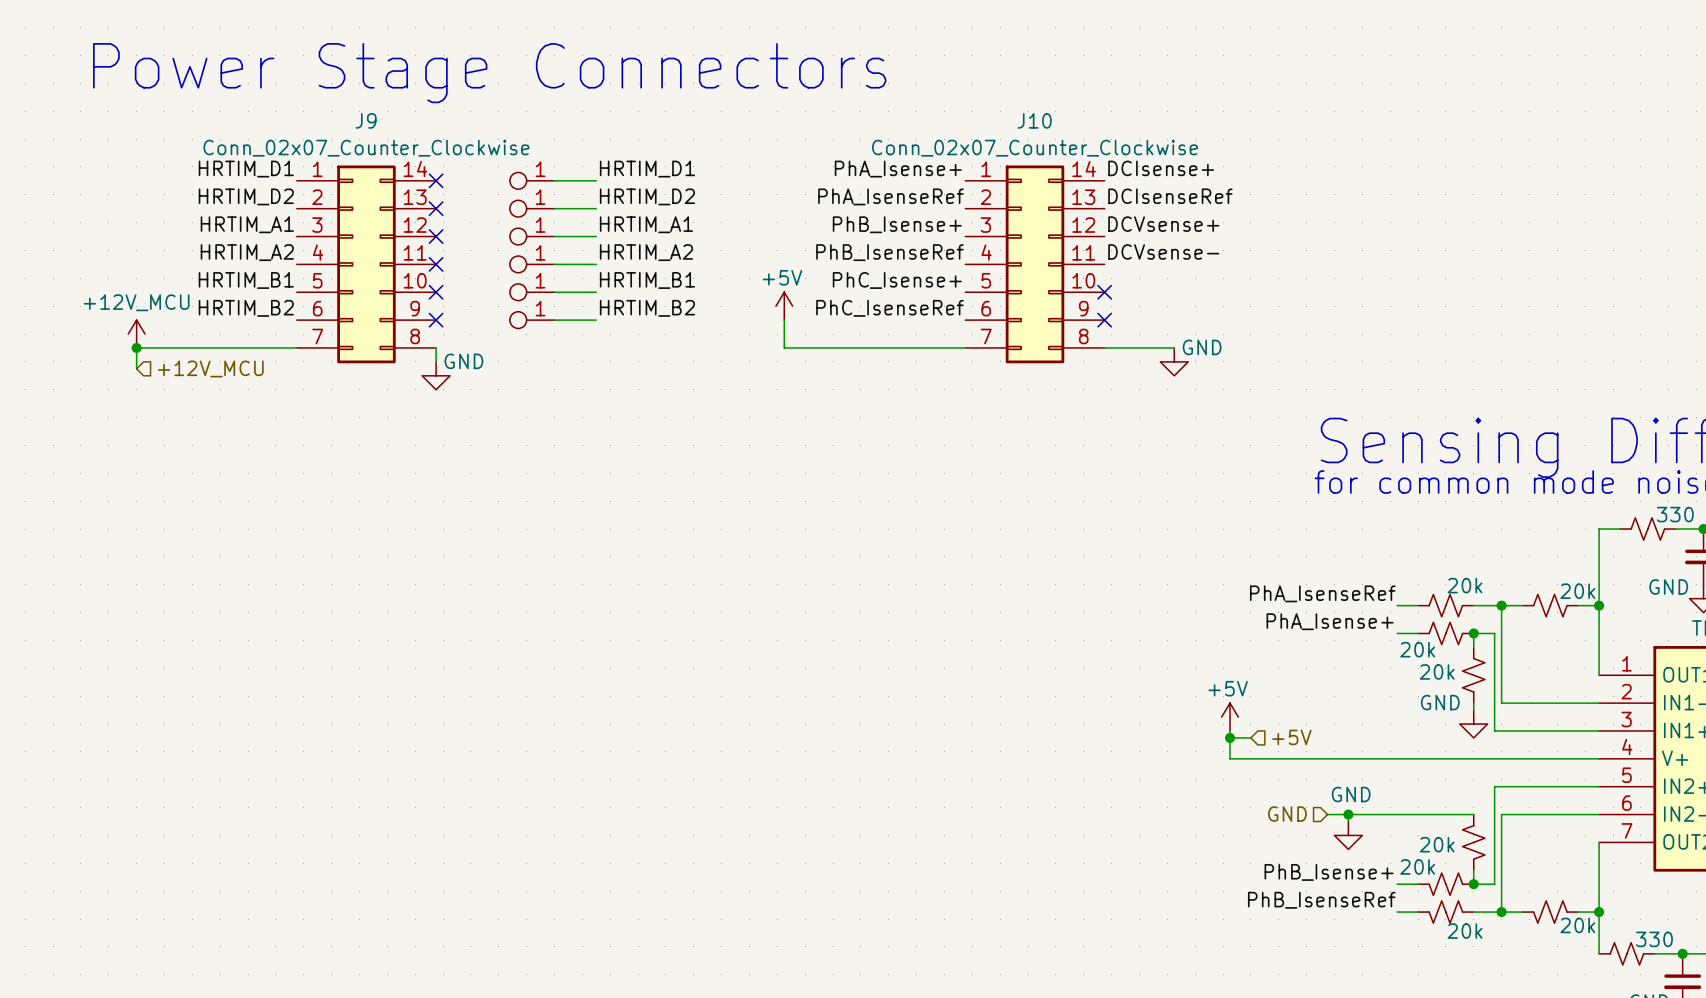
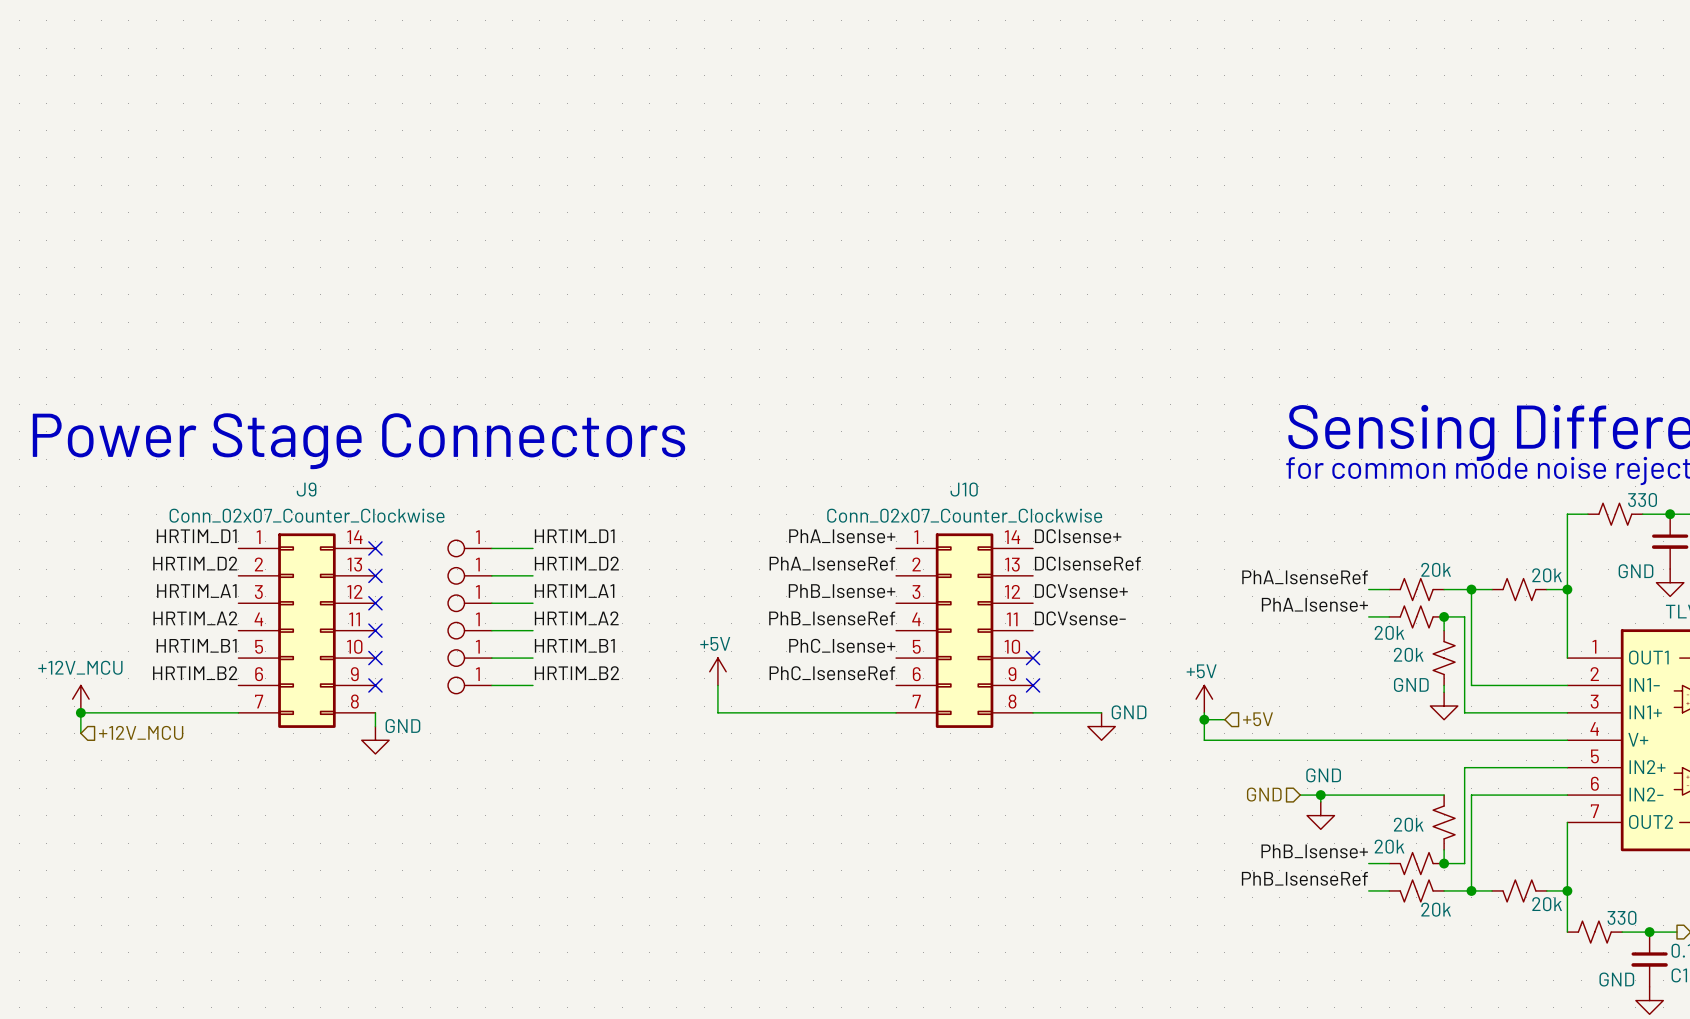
text: Power Stage Connectors (489, 73) -> none
label: DCIsense+ (1161, 168) -> none
label: HRTIM_D1 (246, 169) -> none
label: HRTIM_D1 (647, 169) -> none
label: PhA_Isense+ (898, 169) -> none
no-connect mark: (436, 180) -> none
part: (532, 180) -> none
wire: (554, 180) (596, 180) -> none
label: HRTIM_D2 (246, 196) -> none
label: HRTIM_D2 (647, 196) -> none
label: PhA_IsenseRef (890, 196) -> none
label: DCIsenseRef (1170, 196) -> none
no-connect mark: (436, 208) -> none
part: (532, 208) -> none
wire: (554, 208) (596, 208) -> none
label: HRTIM_A1 (247, 224) -> none
label: HRTIM_A1 (646, 224) -> none
label: PhB_Isense+ (897, 224) -> none
label: DCVsense+ (1163, 224) -> none
no-connect mark: (436, 236) -> none
part: (532, 236) -> none
wire: (554, 236) (596, 236) -> none
label: DCVsense- (1163, 251) -> none
label: HRTIM_A2 (247, 252) -> none
label: HRTIM_A2 (646, 252) -> none
label: PhB_IsenseRef (889, 252) -> none
J9 position: (366, 264) -> (306, 630)
no-connect mark: (436, 264) -> none
part: (532, 264) -> none
wire: (554, 264) (596, 264) -> none
J10 position: (1034, 264) -> (964, 630)
label: HRTIM_B1 (246, 280) -> none
label: HRTIM_B1 (647, 280) -> none
label: PhC_Isense+ (897, 280) -> none
no-connect mark: (436, 292) -> none
part: (532, 292) -> none
wire: (554, 292) (596, 292) -> none
no-connect mark: (1104, 292) -> none
power symbol: +5V (784, 306) -> none
label: HRTIM_B2 (246, 308) -> none
label: HRTIM_B2 (647, 308) -> none
label: PhC_IsenseRef (889, 308) -> none
no-connect mark: (436, 320) -> none
part: (532, 320) -> none
wire: (554, 320) (596, 320) -> (491, 548) (532, 548)
wire: (784, 320) (784, 347) (965, 347) -> none
no-connect mark: (1104, 320) -> none
power symbol: +12V_MCU (136, 334) -> none
junction: (136, 347) -> none
wire: (296, 347) (136, 347) (136, 368) -> none
wire: (436, 347) (436, 361) -> none
wire: (1104, 347) (1174, 347) -> none
power symbol: GND (1174, 361) -> none
hierarchical label: +12V_MCU (210, 368) -> none
power symbol: GND (436, 375) -> none
text: none -> Power Stage Connectors (359, 441)
label: none -> DCIsense+ (1078, 536)
label: none -> HRTIM_D1 (196, 536)
label: none -> HRTIM_D1 (574, 536)
label: none -> PhA_Isense+ (842, 536)
no-connect mark: none -> (375, 548)
part: none -> (469, 548)
label: none -> HRTIM_D2 (195, 563)
label: none -> HRTIM_D2 (576, 563)
label: none -> PhA_IsenseRef (832, 563)
label: none -> DCIsenseRef (1087, 563)
no-connect mark: none -> (375, 575)
part: none -> (469, 575)
wire: none -> (491, 575) (532, 575)
label: none -> HRTIM_A1 (196, 591)
label: none -> HRTIM_A1 (574, 591)
label: none -> PhB_Isense+ (842, 591)
label: none -> DCVsense+ (1081, 591)
no-connect mark: none -> (375, 603)
part: none -> (469, 603)
wire: none -> (491, 603) (532, 603)
label: none -> DCVsense- (1080, 618)
label: none -> HRTIM_A2 (195, 618)
label: none -> HRTIM_A2 (576, 618)
label: none -> PhB_IsenseRef (832, 618)
no-connect mark: none -> (375, 630)
part: none -> (469, 630)
wire: none -> (491, 630) (532, 630)
label: none -> HRTIM_B1 (196, 645)
label: none -> HRTIM_B1 (574, 645)
label: none -> PhC_Isense+ (842, 645)
no-connect mark: none -> (375, 658)
part: none -> (469, 658)
wire: none -> (491, 658) (532, 658)
no-connect mark: none -> (1033, 658)
power symbol: none -> +5V (717, 671)
label: none -> HRTIM_B2 (195, 673)
label: none -> HRTIM_B2 (576, 673)
label: none -> PhC_IsenseRef (832, 673)
no-connect mark: none -> (375, 685)
part: none -> (469, 685)
wire: none -> (491, 685) (532, 685)
wire: none -> (717, 685) (717, 712) (896, 712)
no-connect mark: none -> (1033, 685)
power symbol: none -> +12V_MCU (80, 699)
junction: none -> (80, 712)
wire: none -> (238, 712) (80, 712) (80, 733)
wire: none -> (375, 712) (375, 726)
wire: none -> (1033, 712) (1101, 712)
power symbol: none -> GND (1101, 726)
hierarchical label: none -> +12V_MCU (141, 732)
power symbol: none -> GND (375, 740)

